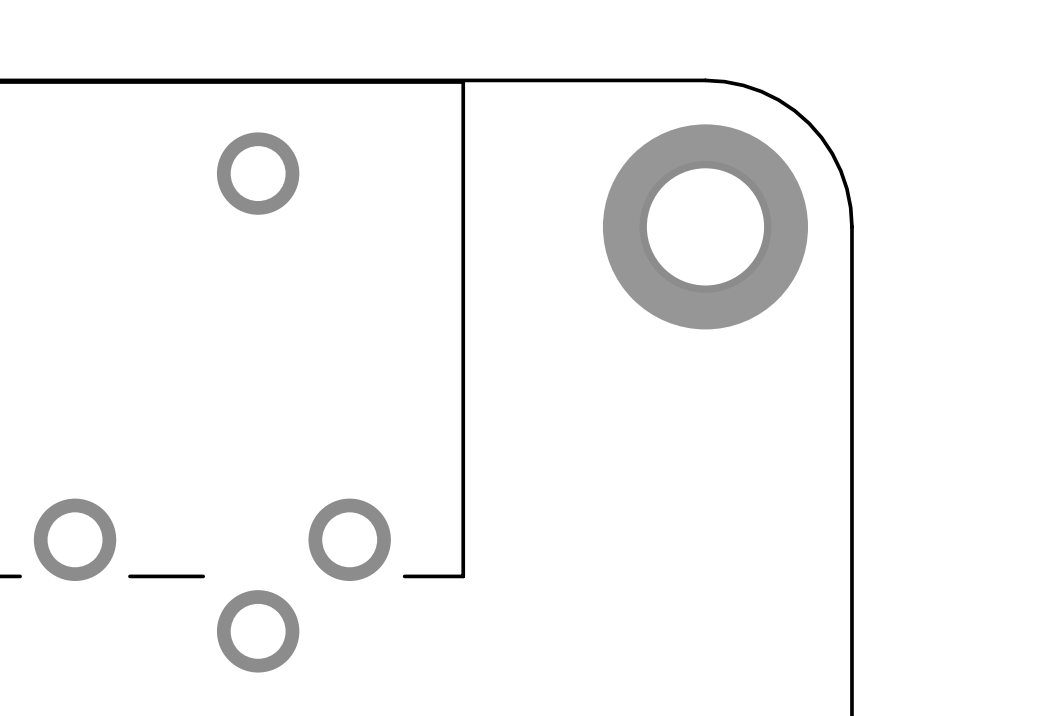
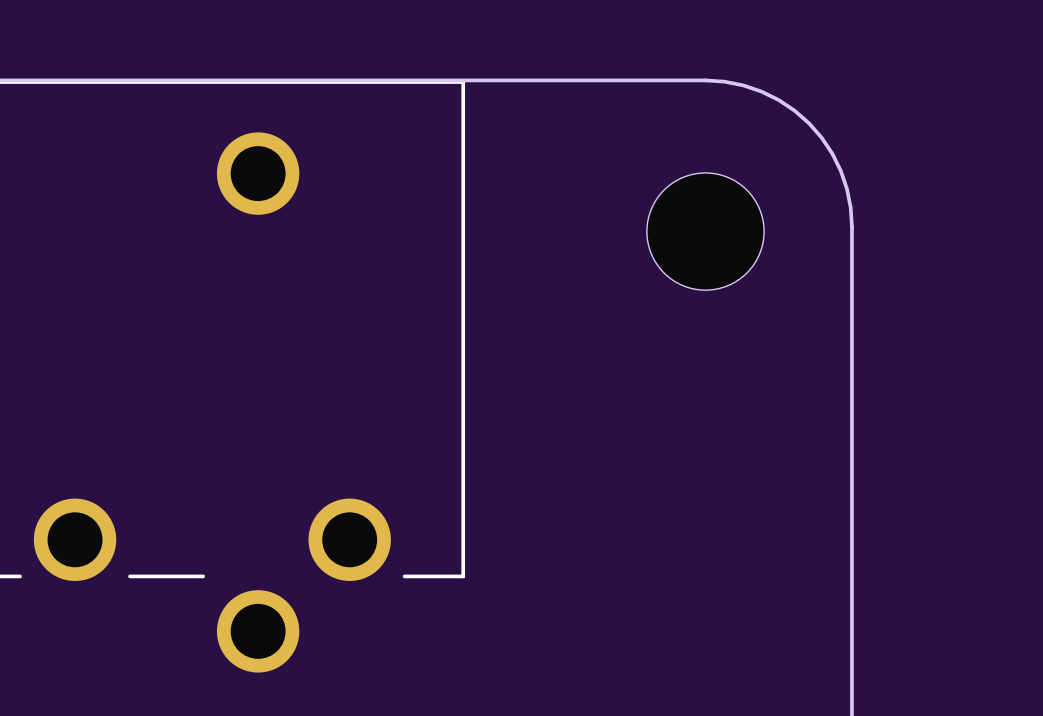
part footprint: [602, 124, 809, 330] -> [646, 172, 765, 291]

